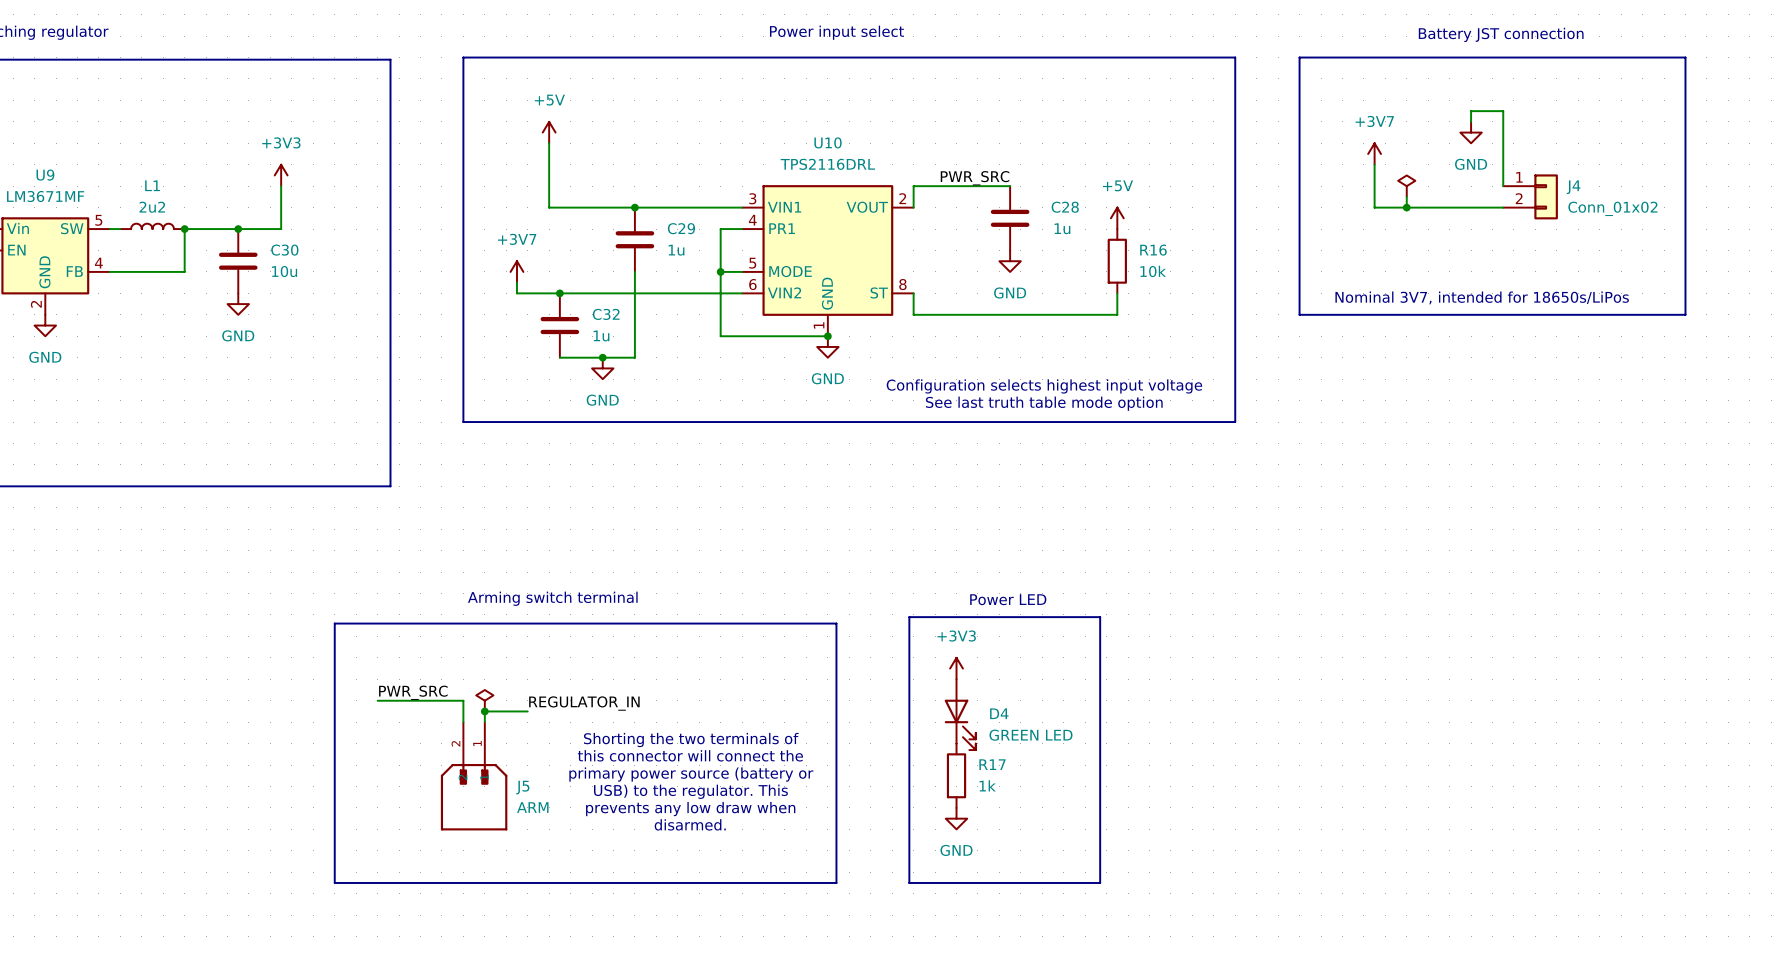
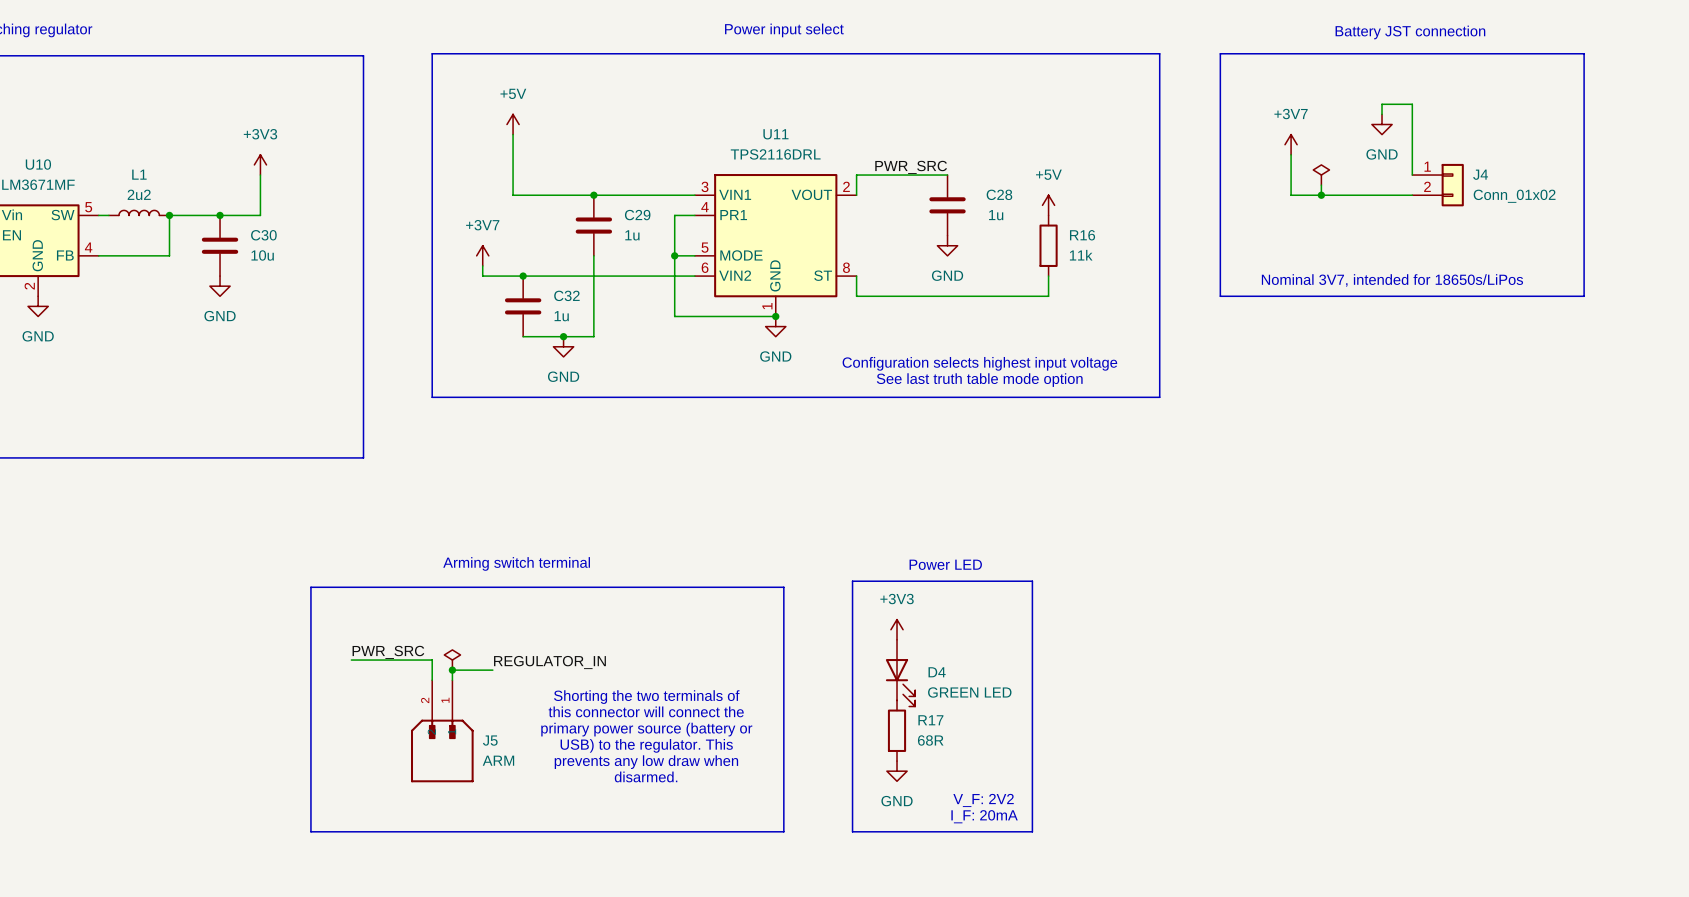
U10 name: U10 (828, 142) -> U11 (775, 134)
U9 name: U9 (45, 175) -> U10 (38, 164)
R16 value: 10k (1153, 271) -> 11k (1081, 255)
R17 value: 1k (987, 785) -> 68R (930, 740)
text: none -> V_F: 2V2 (983, 800)
text: none -> I_F: 20mA (984, 816)

